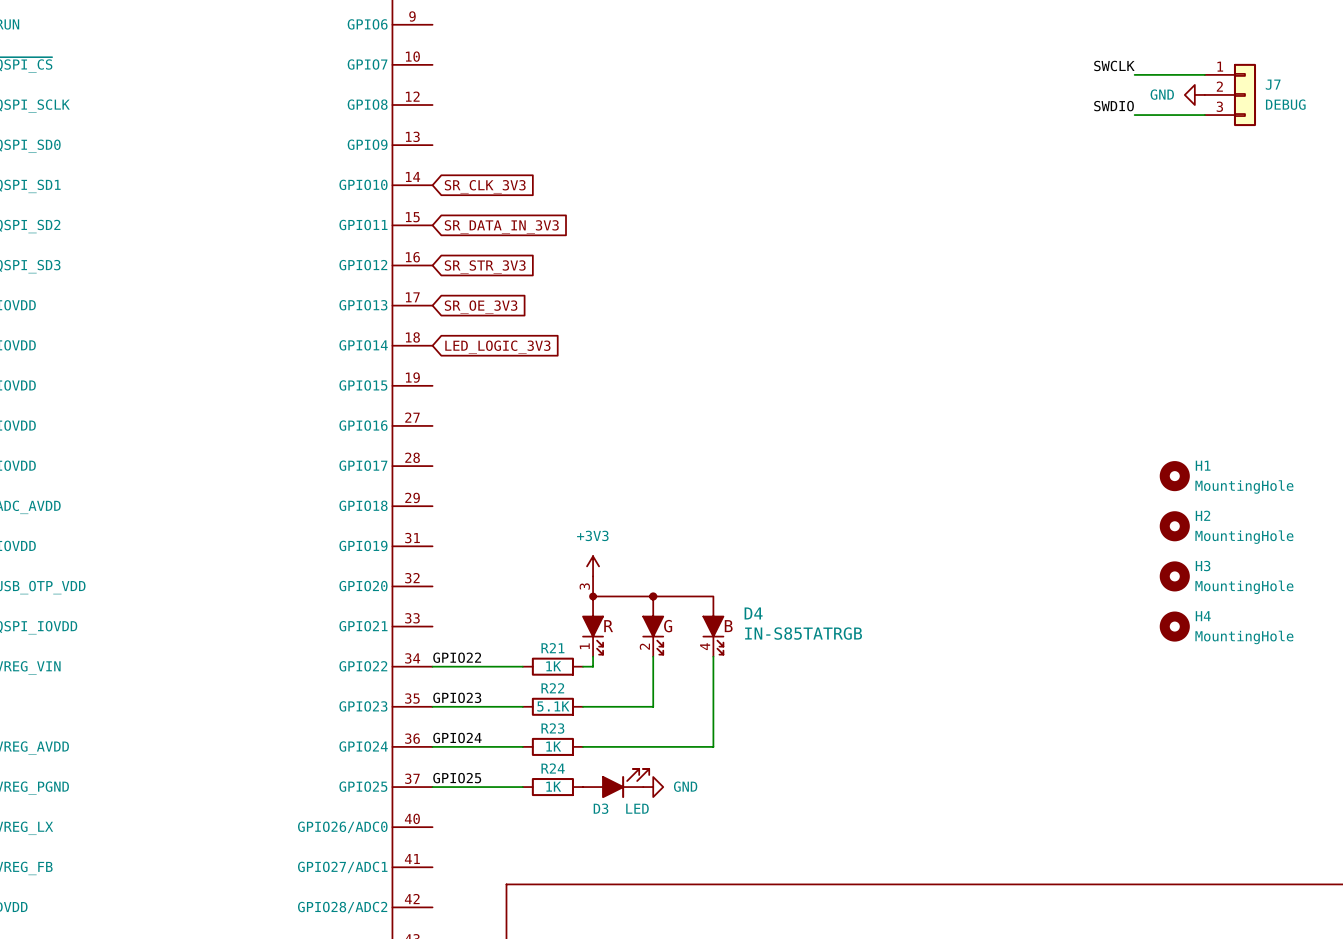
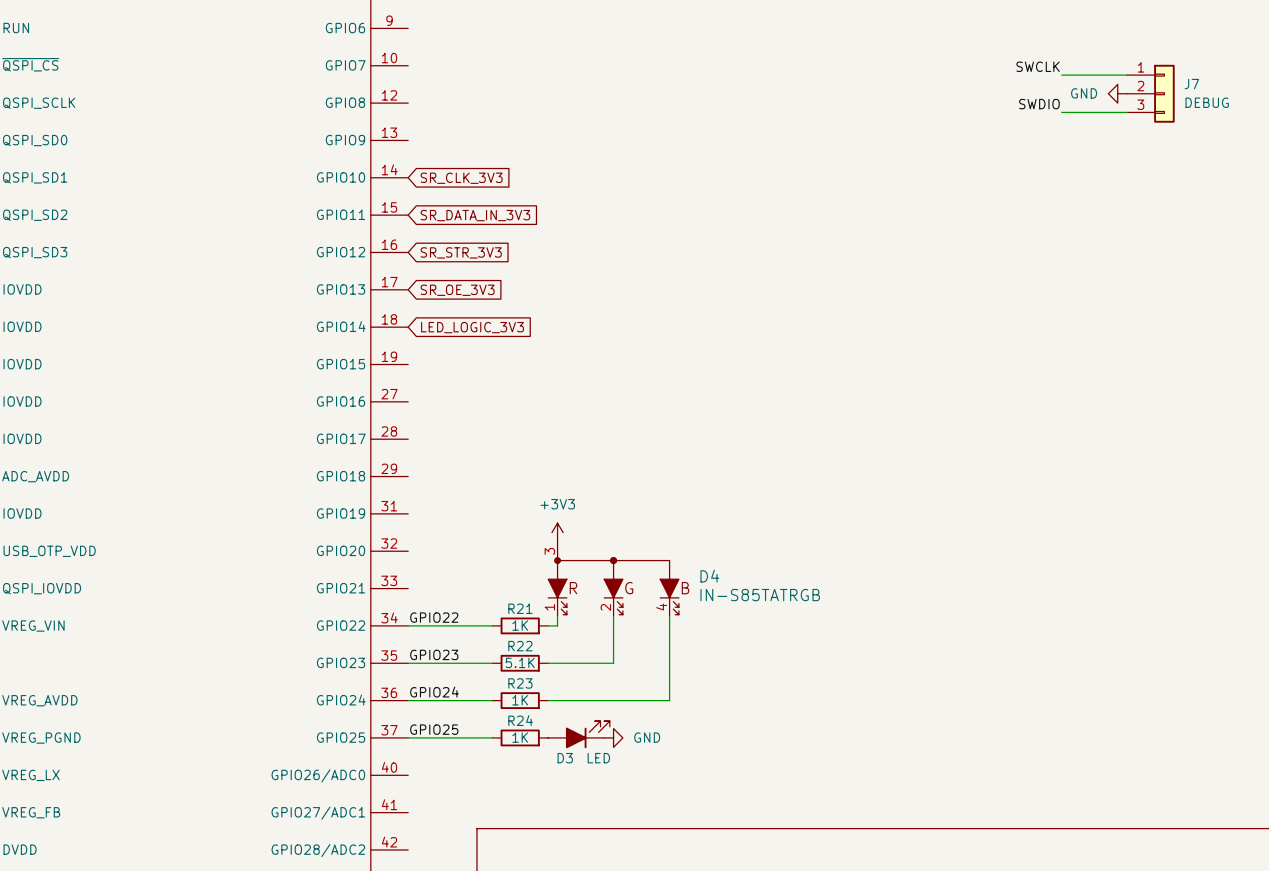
H1: MountingHole (1174, 476) -> none
H2: MountingHole (1174, 526) -> none
H3: MountingHole (1174, 576) -> none
H4: MountingHole (1174, 626) -> none

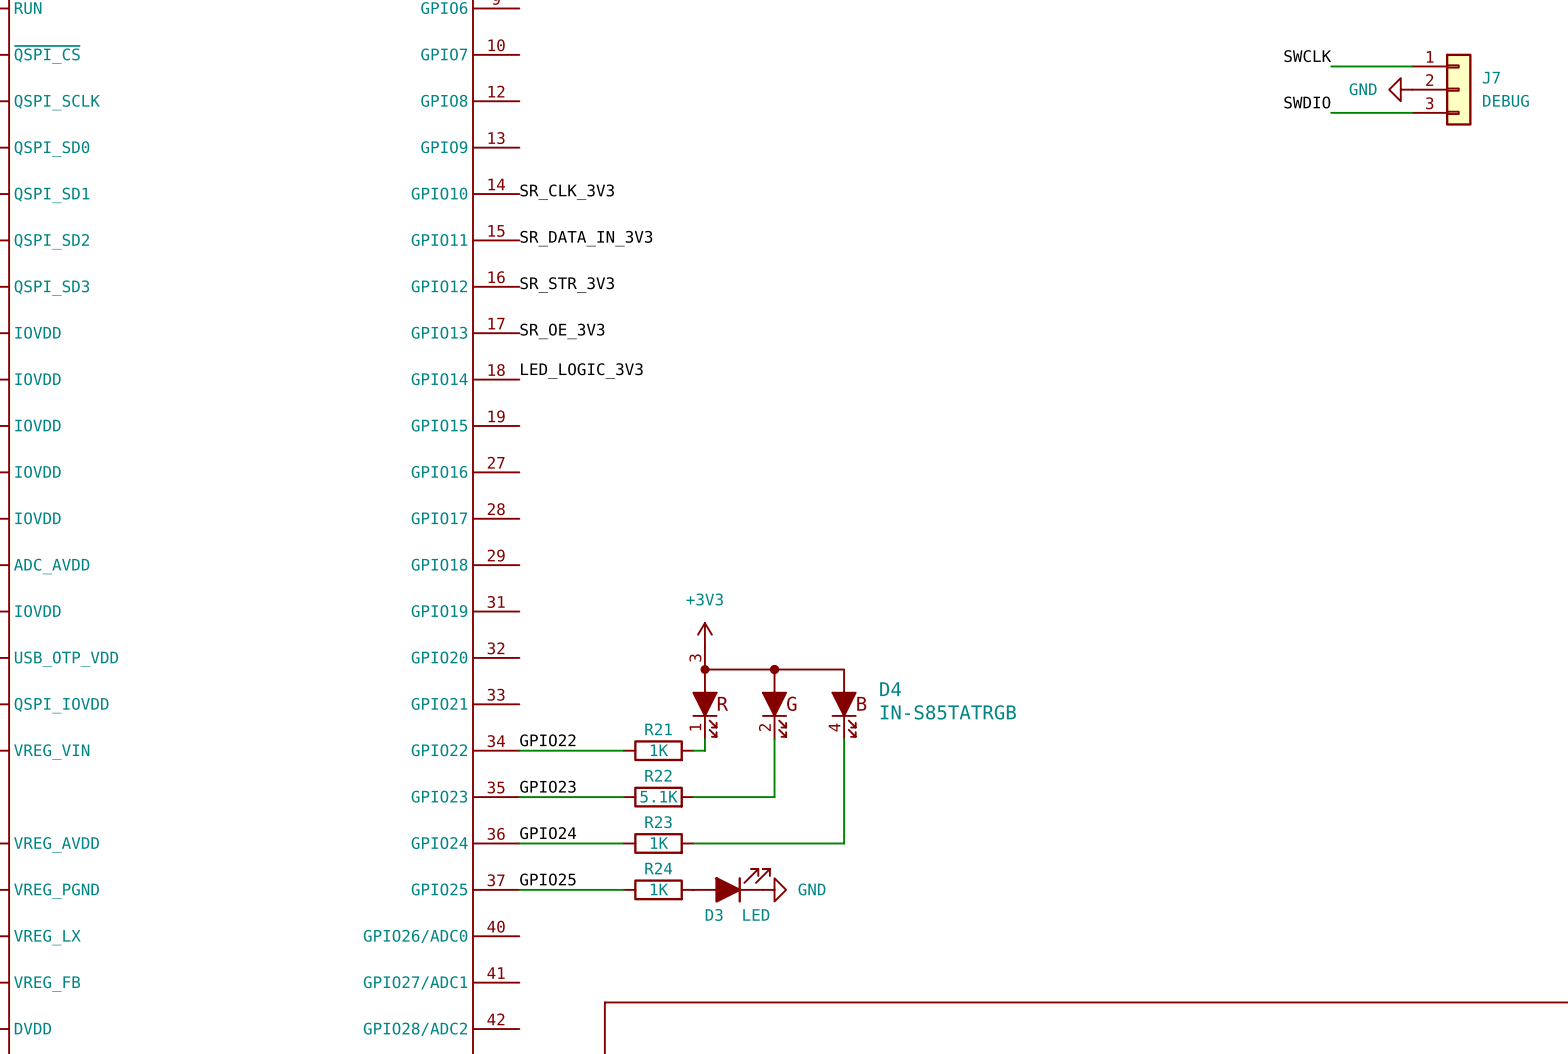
label: none -> SR_CLK_3V3 (567, 192)
global label: SR_CLK_3V3 (461, 178) -> none
label: none -> SR_DATA_IN_3V3 (586, 238)
global label: SR_DATA_IN_3V3 (475, 215) -> none
label: none -> SR_STR_3V3 (567, 285)
global label: SR_STR_3V3 (461, 252) -> none
label: none -> SR_OE_3V3 (562, 331)
global label: SR_OE_3V3 (457, 290) -> none
label: none -> LED_LOGIC_3V3 (581, 371)
global label: LED_LOGIC_3V3 (472, 327) -> none

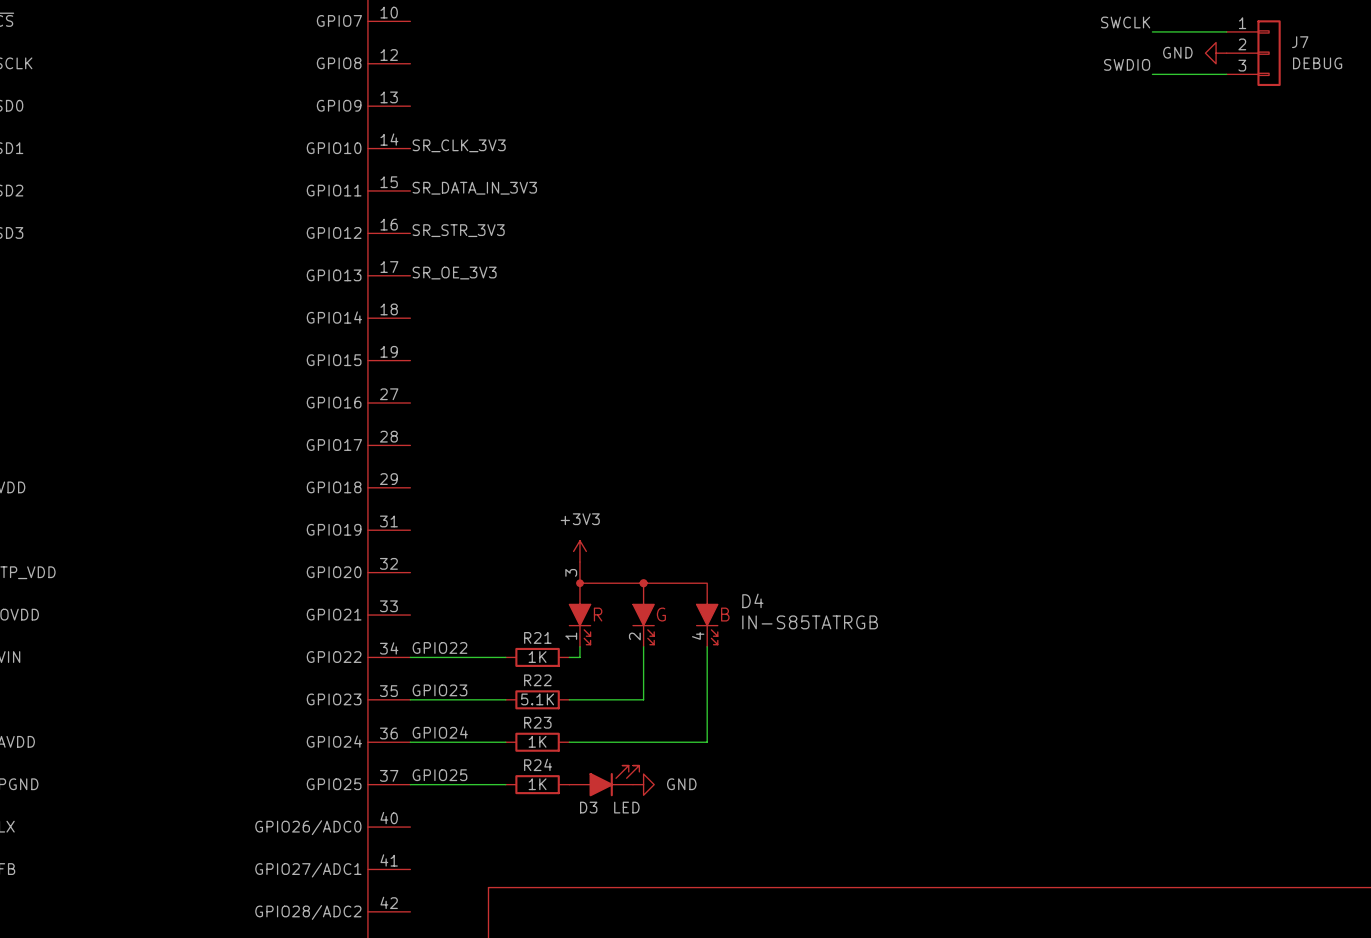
label: LED_LOGIC_3V3 (581, 371) -> none

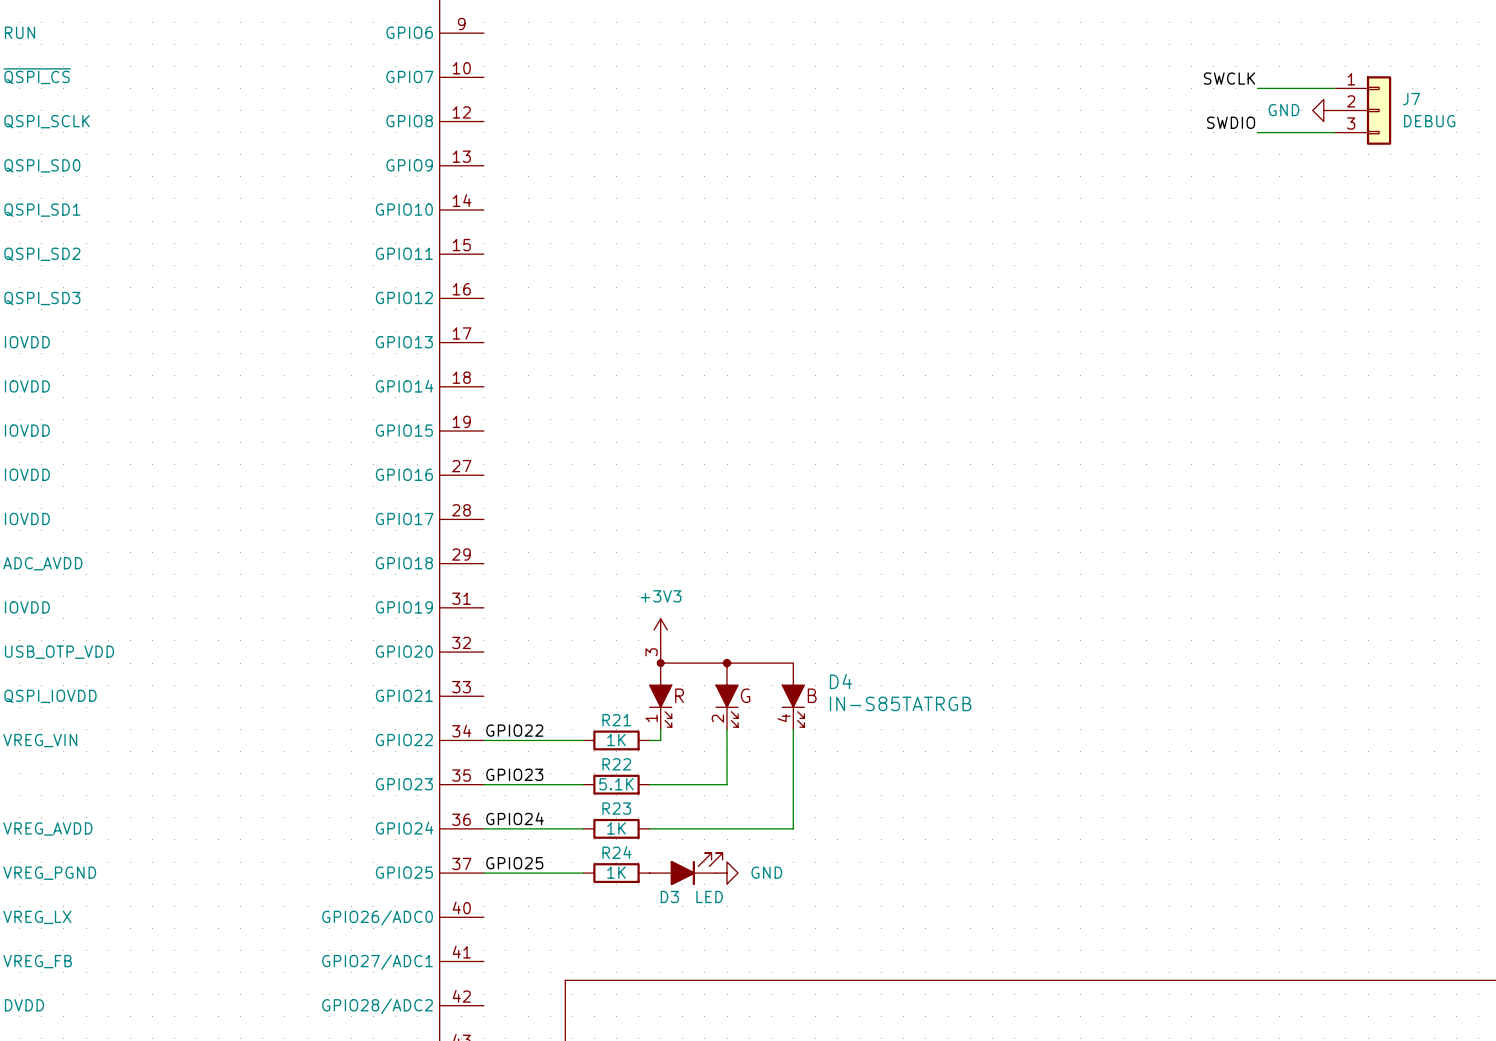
label: SR_CLK_3V3 (459, 145) -> none
label: SR_DATA_IN_3V3 (474, 188) -> none
label: SR_STR_3V3 (458, 230) -> none
label: SR_OE_3V3 (454, 273) -> none

